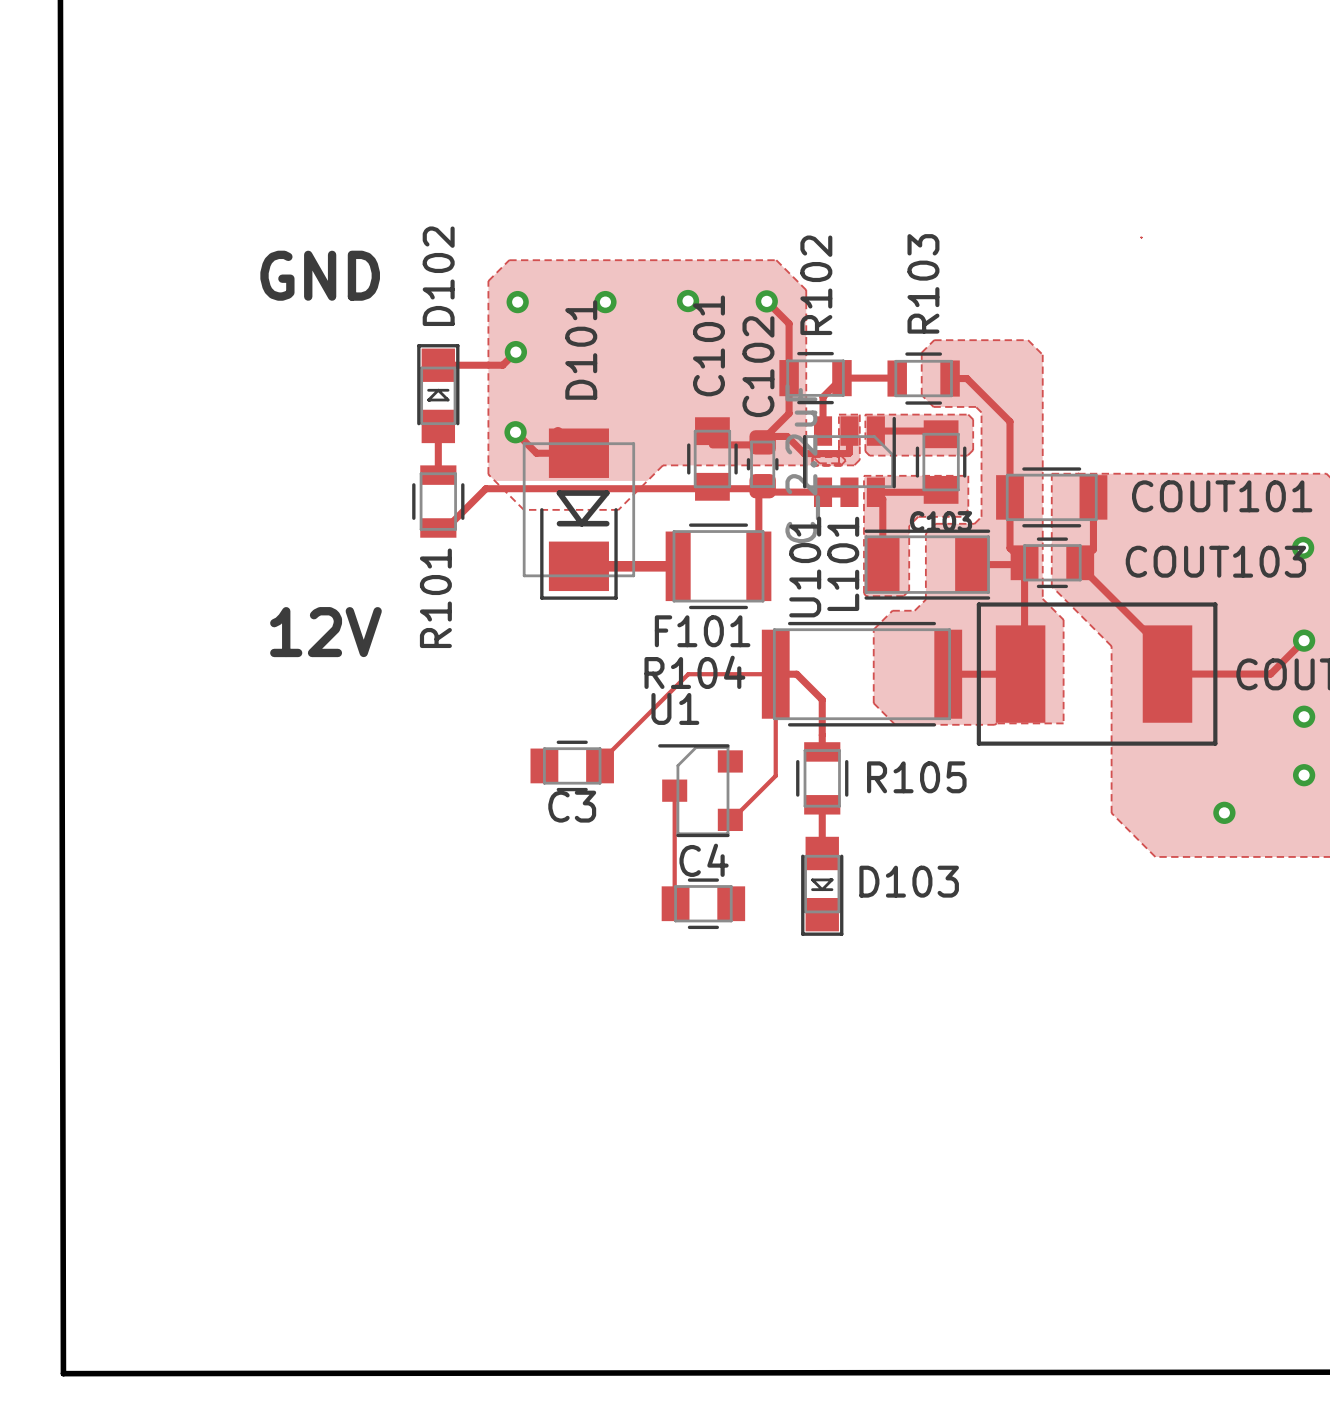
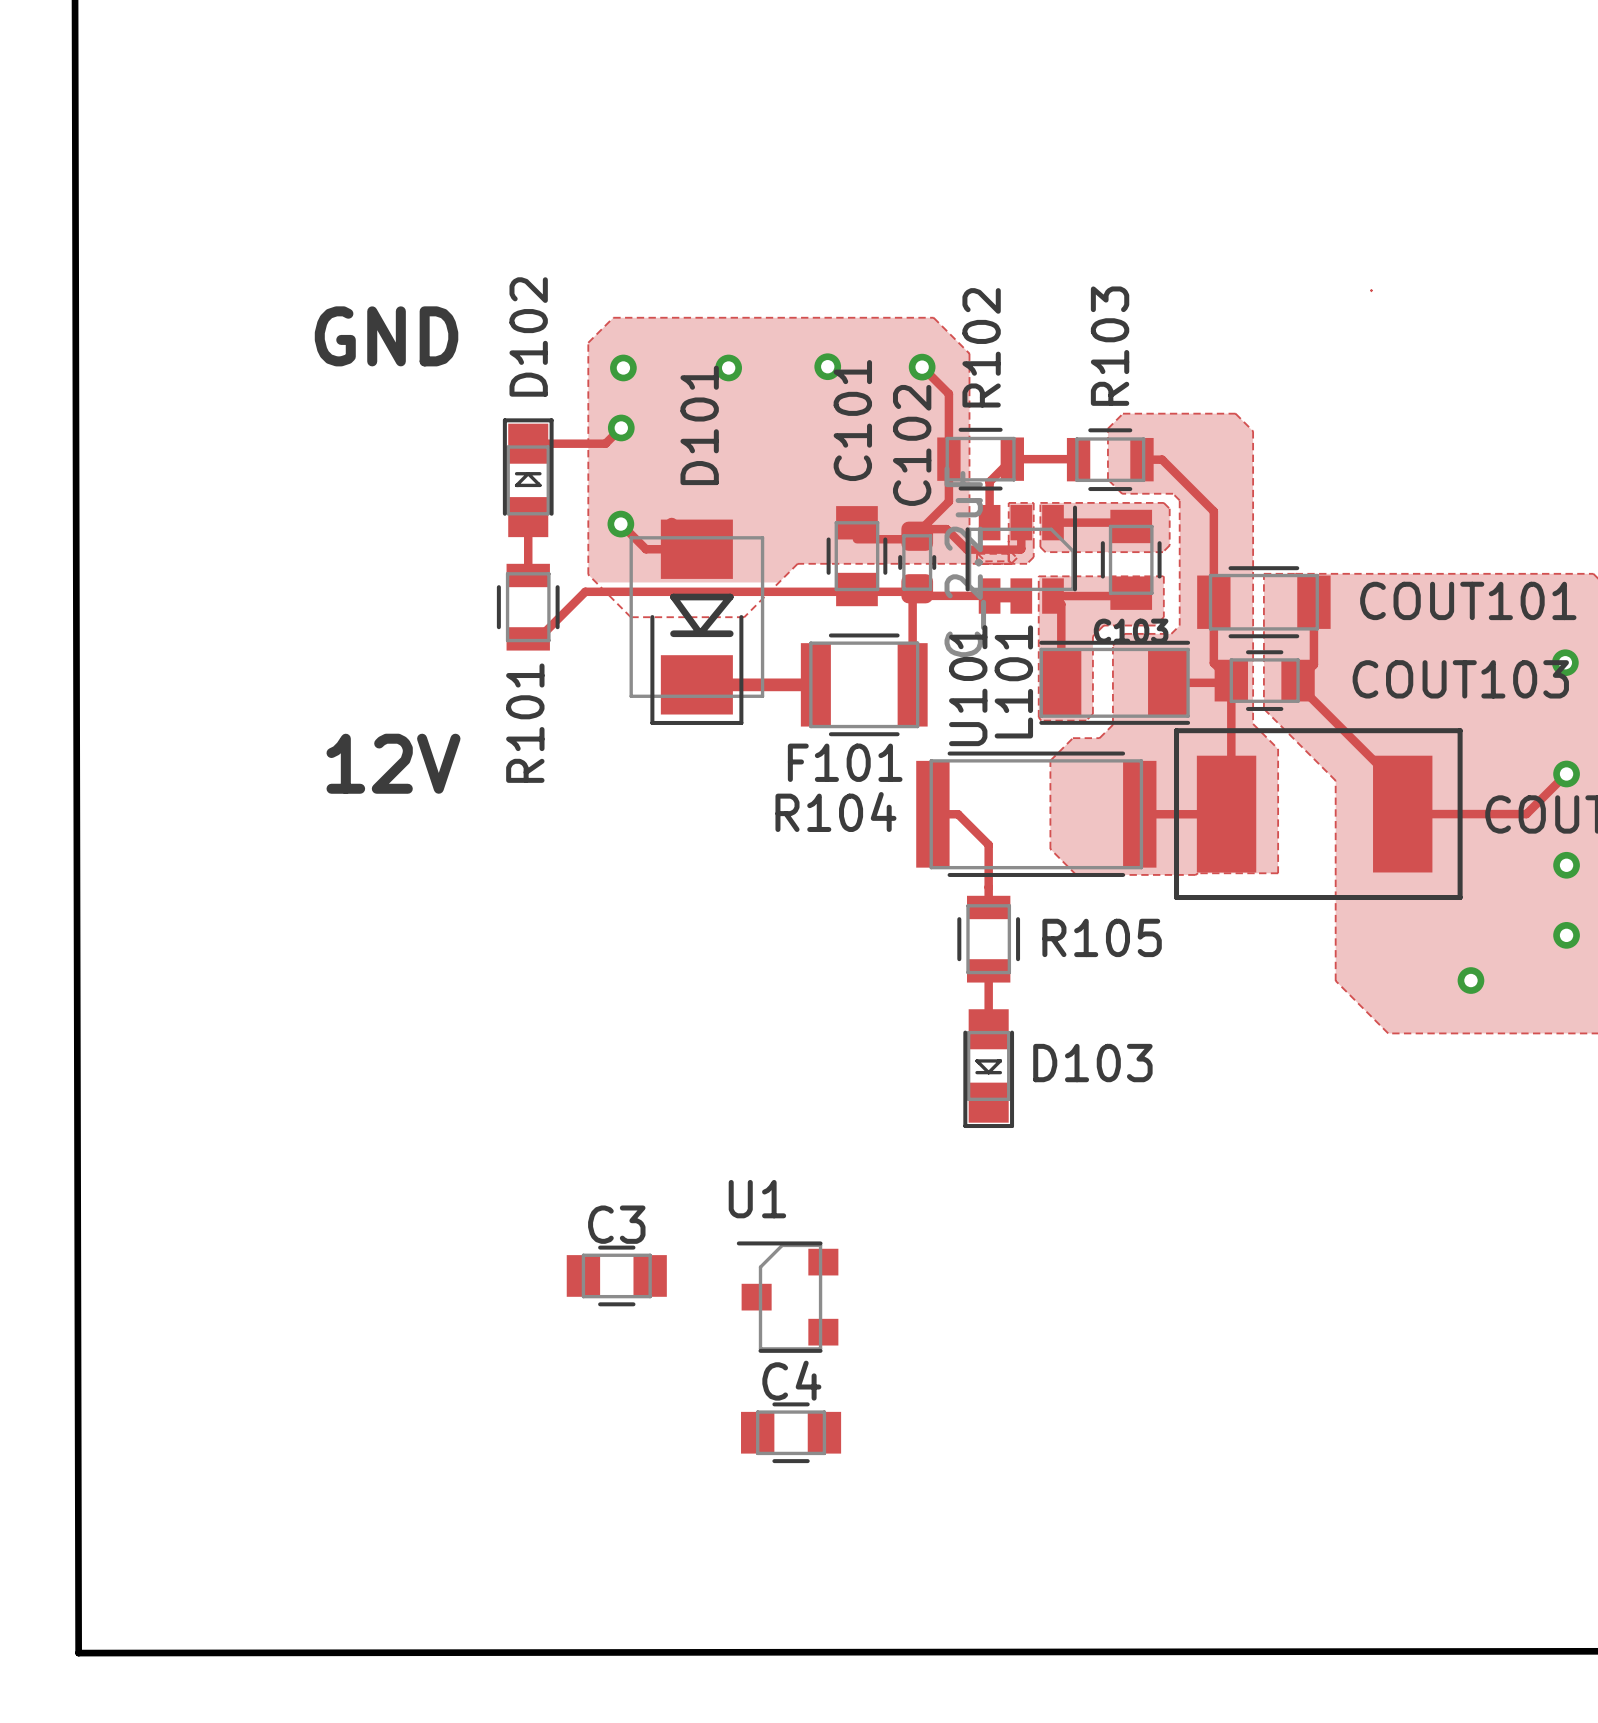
C3 position: (572, 765) -> (616, 1275)
track: (600, 765) (600, 762) (688, 674) (775, 674) (775, 775) (730, 819) -> none
track: (674, 790) (675, 903) -> none
U1 position: (700, 790) -> (787, 1297)
C3 name position: C3 (572, 806) -> C3 (616, 1224)
C4 position: (703, 903) -> (791, 1432)

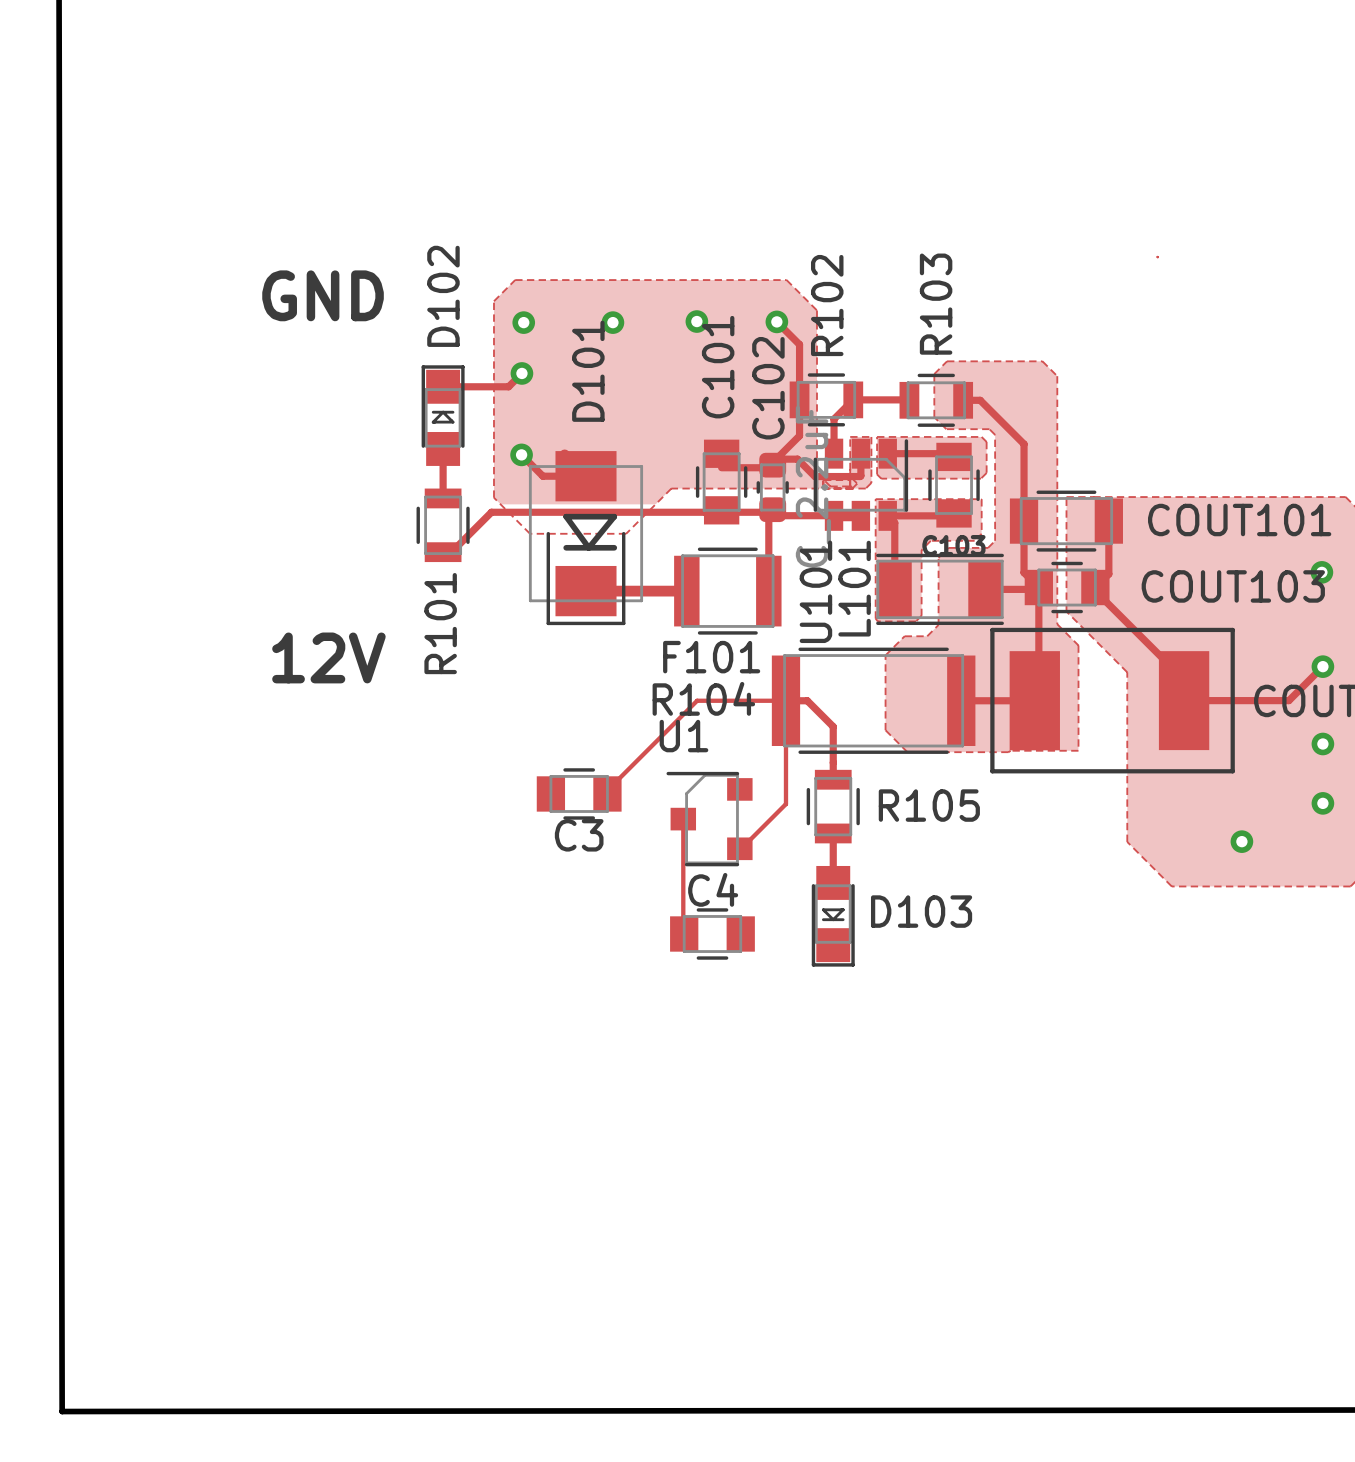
track: none -> (607, 793) (607, 790) (697, 700) (785, 700) (785, 804) (739, 848)
track: none -> (683, 819) (684, 933)
C3 name position: C3 (616, 1224) -> C3 (579, 835)
C3 position: (616, 1275) -> (579, 793)
U1 position: (787, 1297) -> (709, 819)
C4 position: (791, 1432) -> (712, 933)

